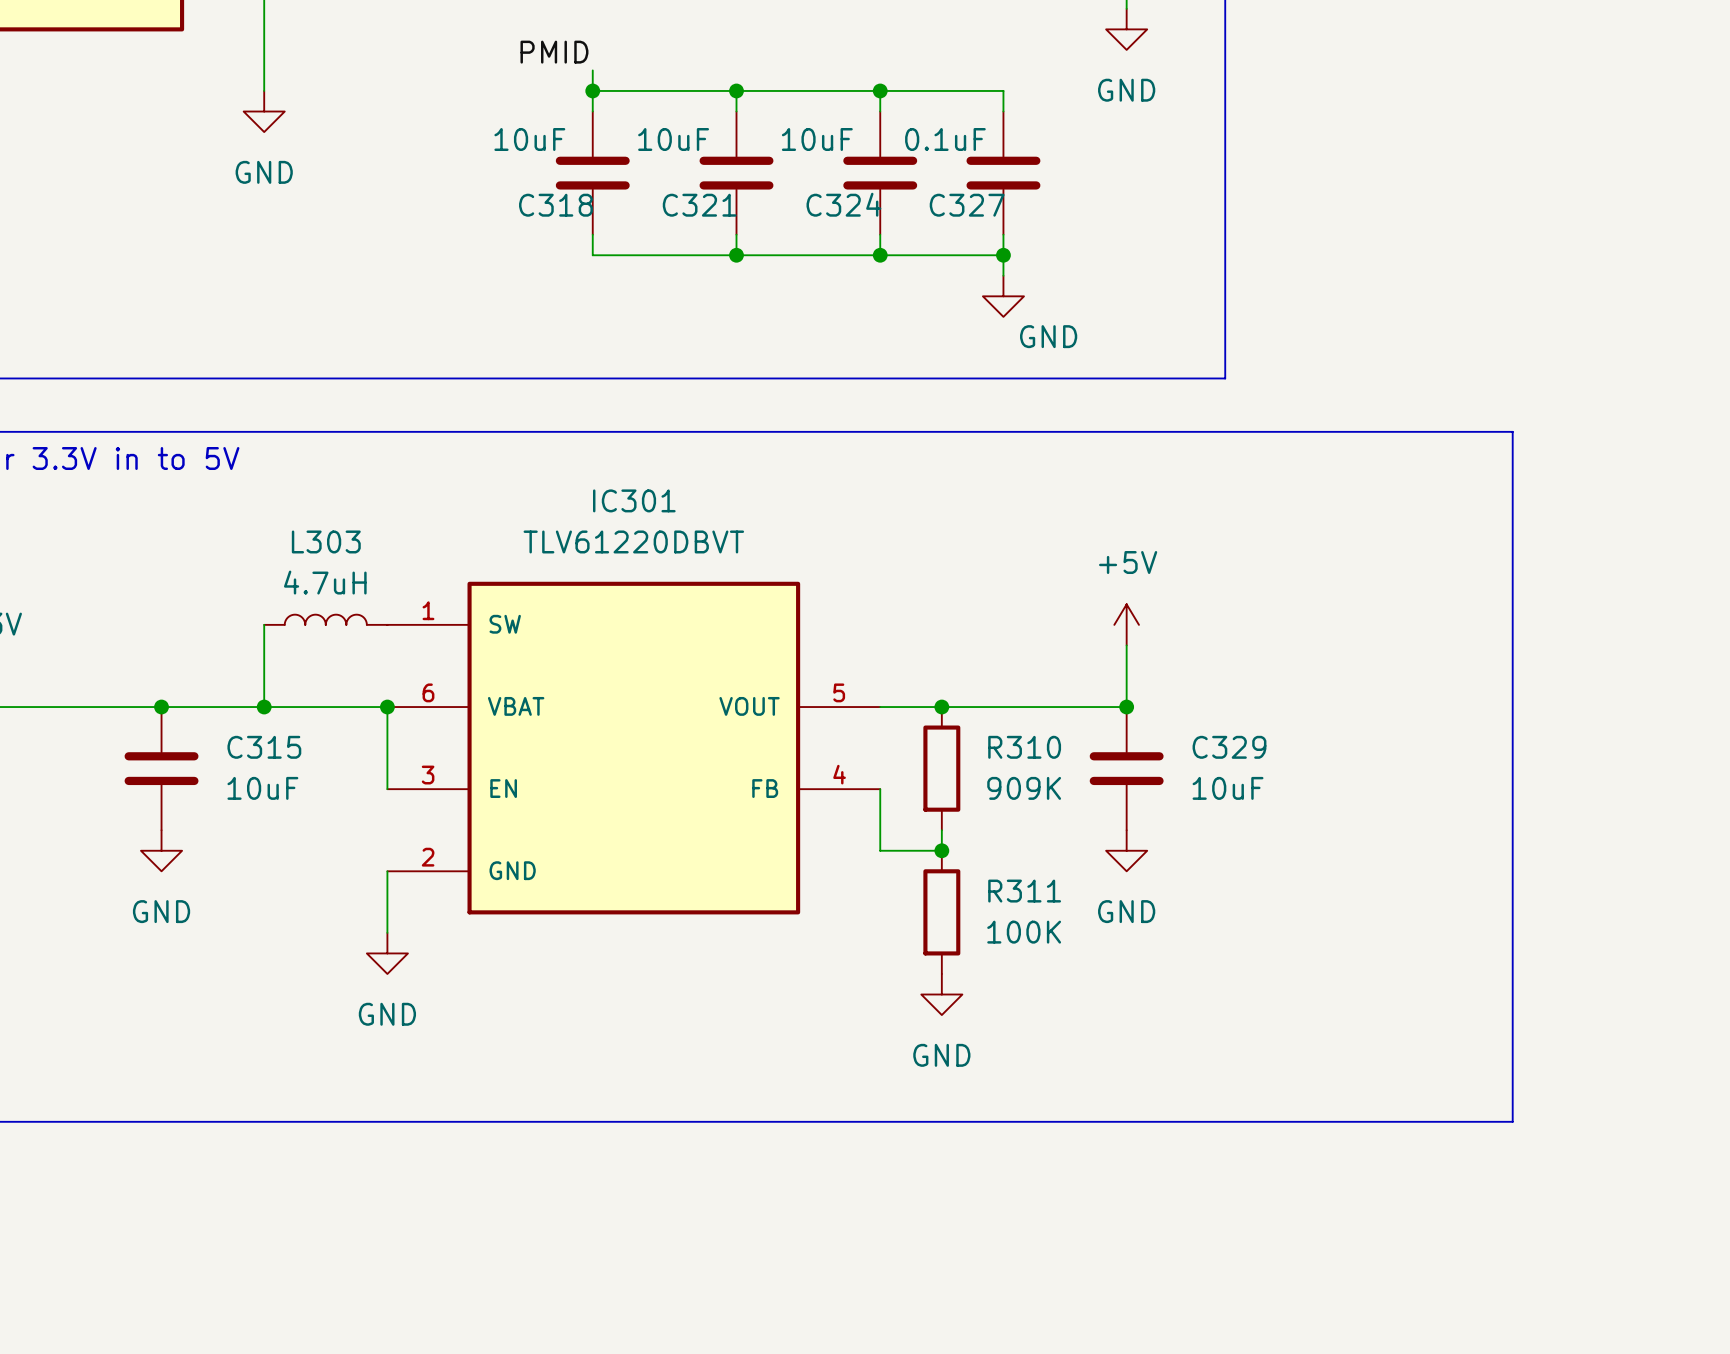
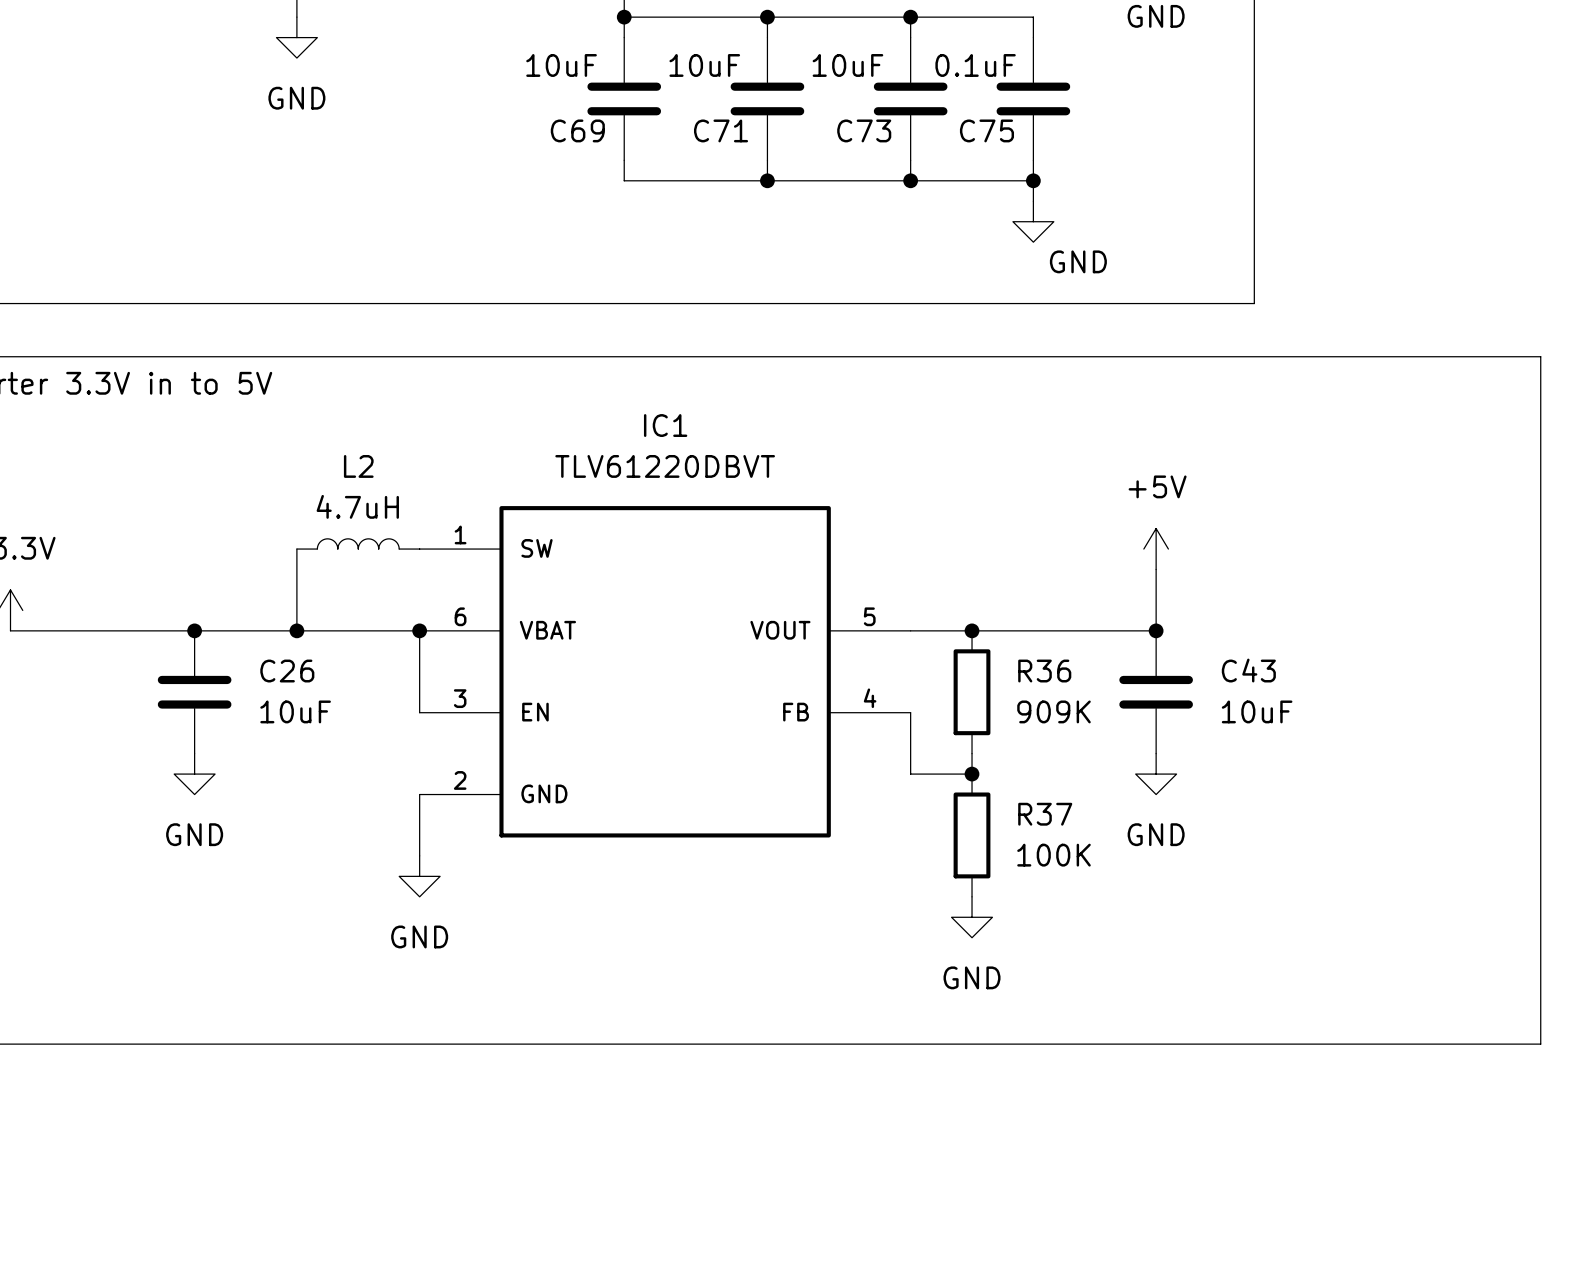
C324 name: C324 (843, 204) -> C73 (864, 130)
C318 name: C318 (555, 205) -> C69 (577, 130)
C321 name: C321 (699, 205) -> C71 (721, 130)
C327 name: C327 (967, 205) -> C75 (986, 130)
IC301 name: IC301 (634, 500) -> IC1 (665, 425)
L303 name: L303 (326, 541) -> L2 (358, 466)
C315 name: C315 (264, 747) -> C26 (287, 671)
R310 name: R310 (1024, 747) -> R36 (1044, 671)
C329 name: C329 (1229, 747) -> C43 (1248, 670)
R311 name: R311 (1024, 891) -> R37 (1045, 814)

